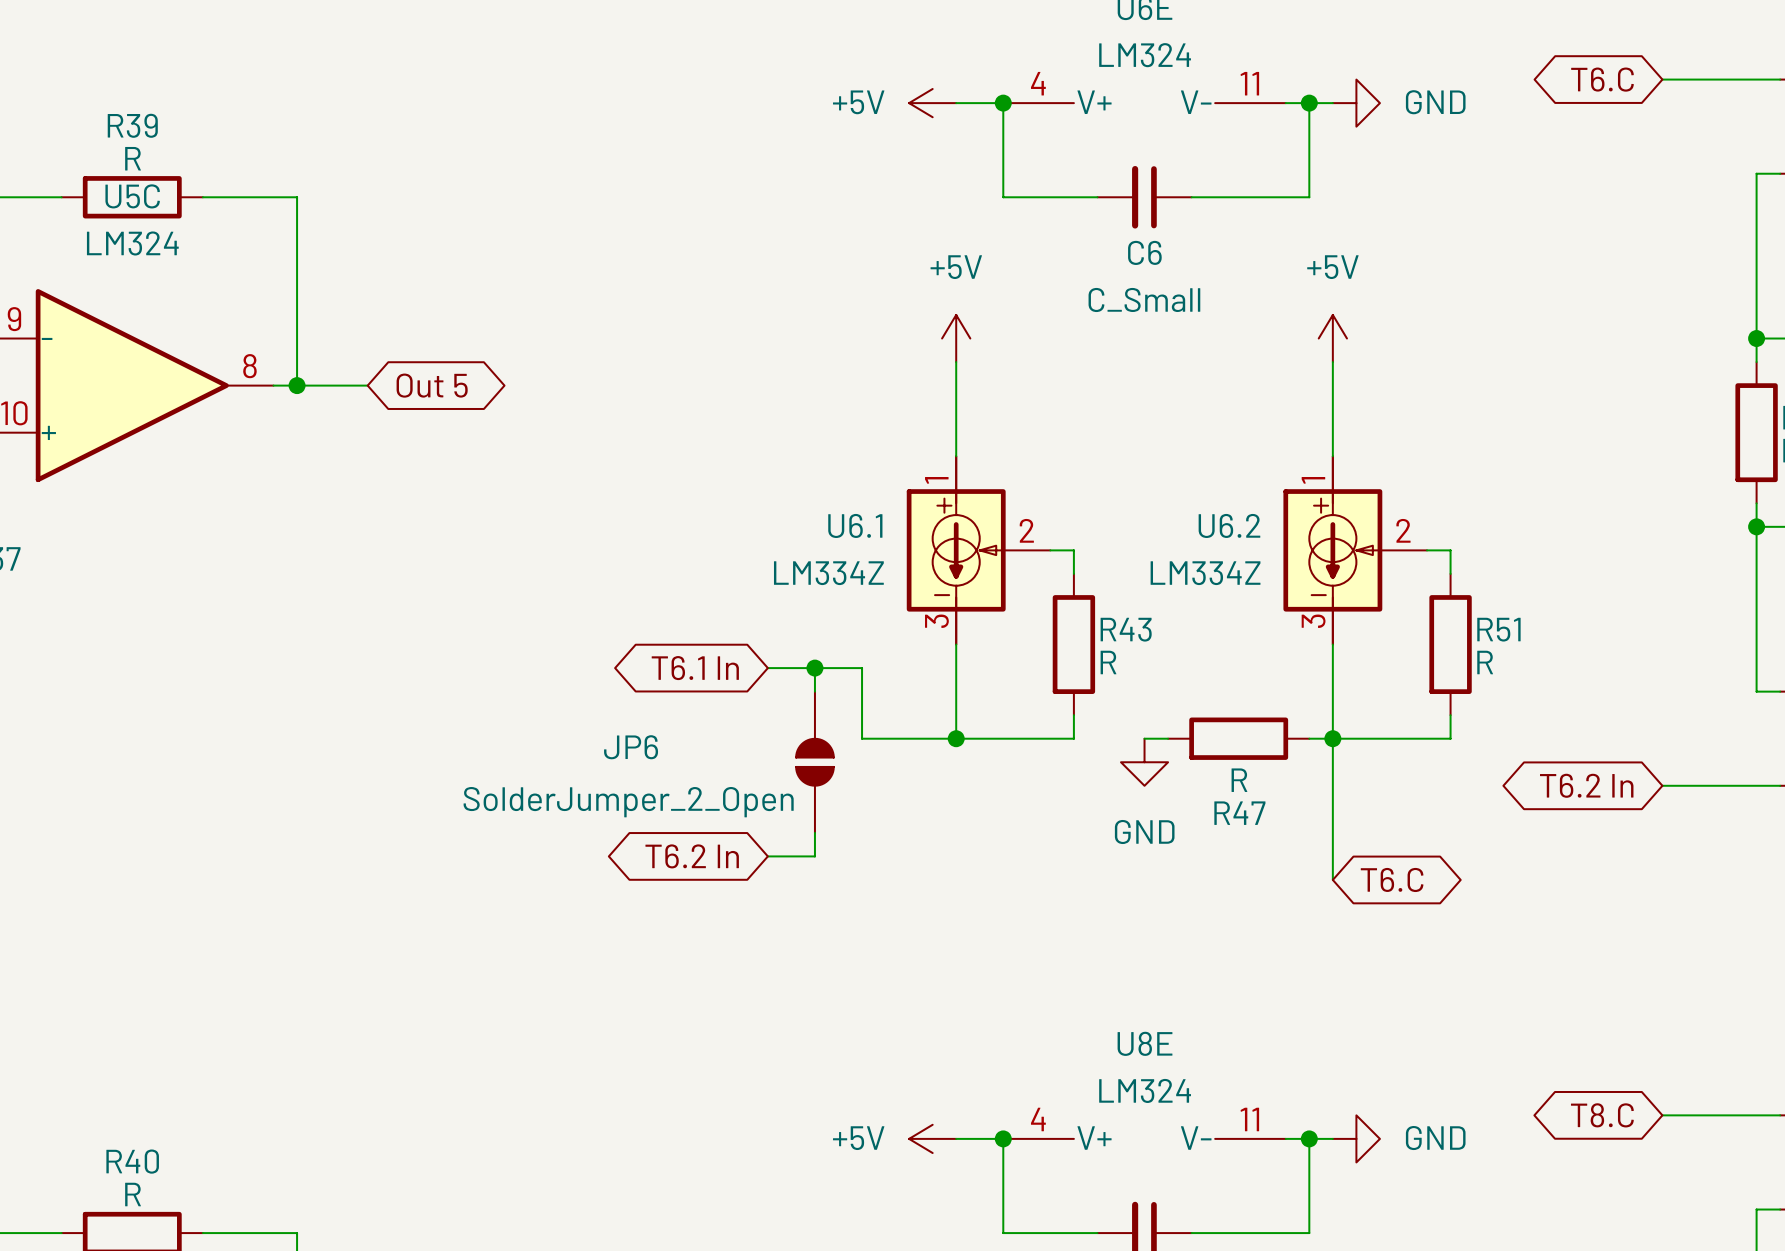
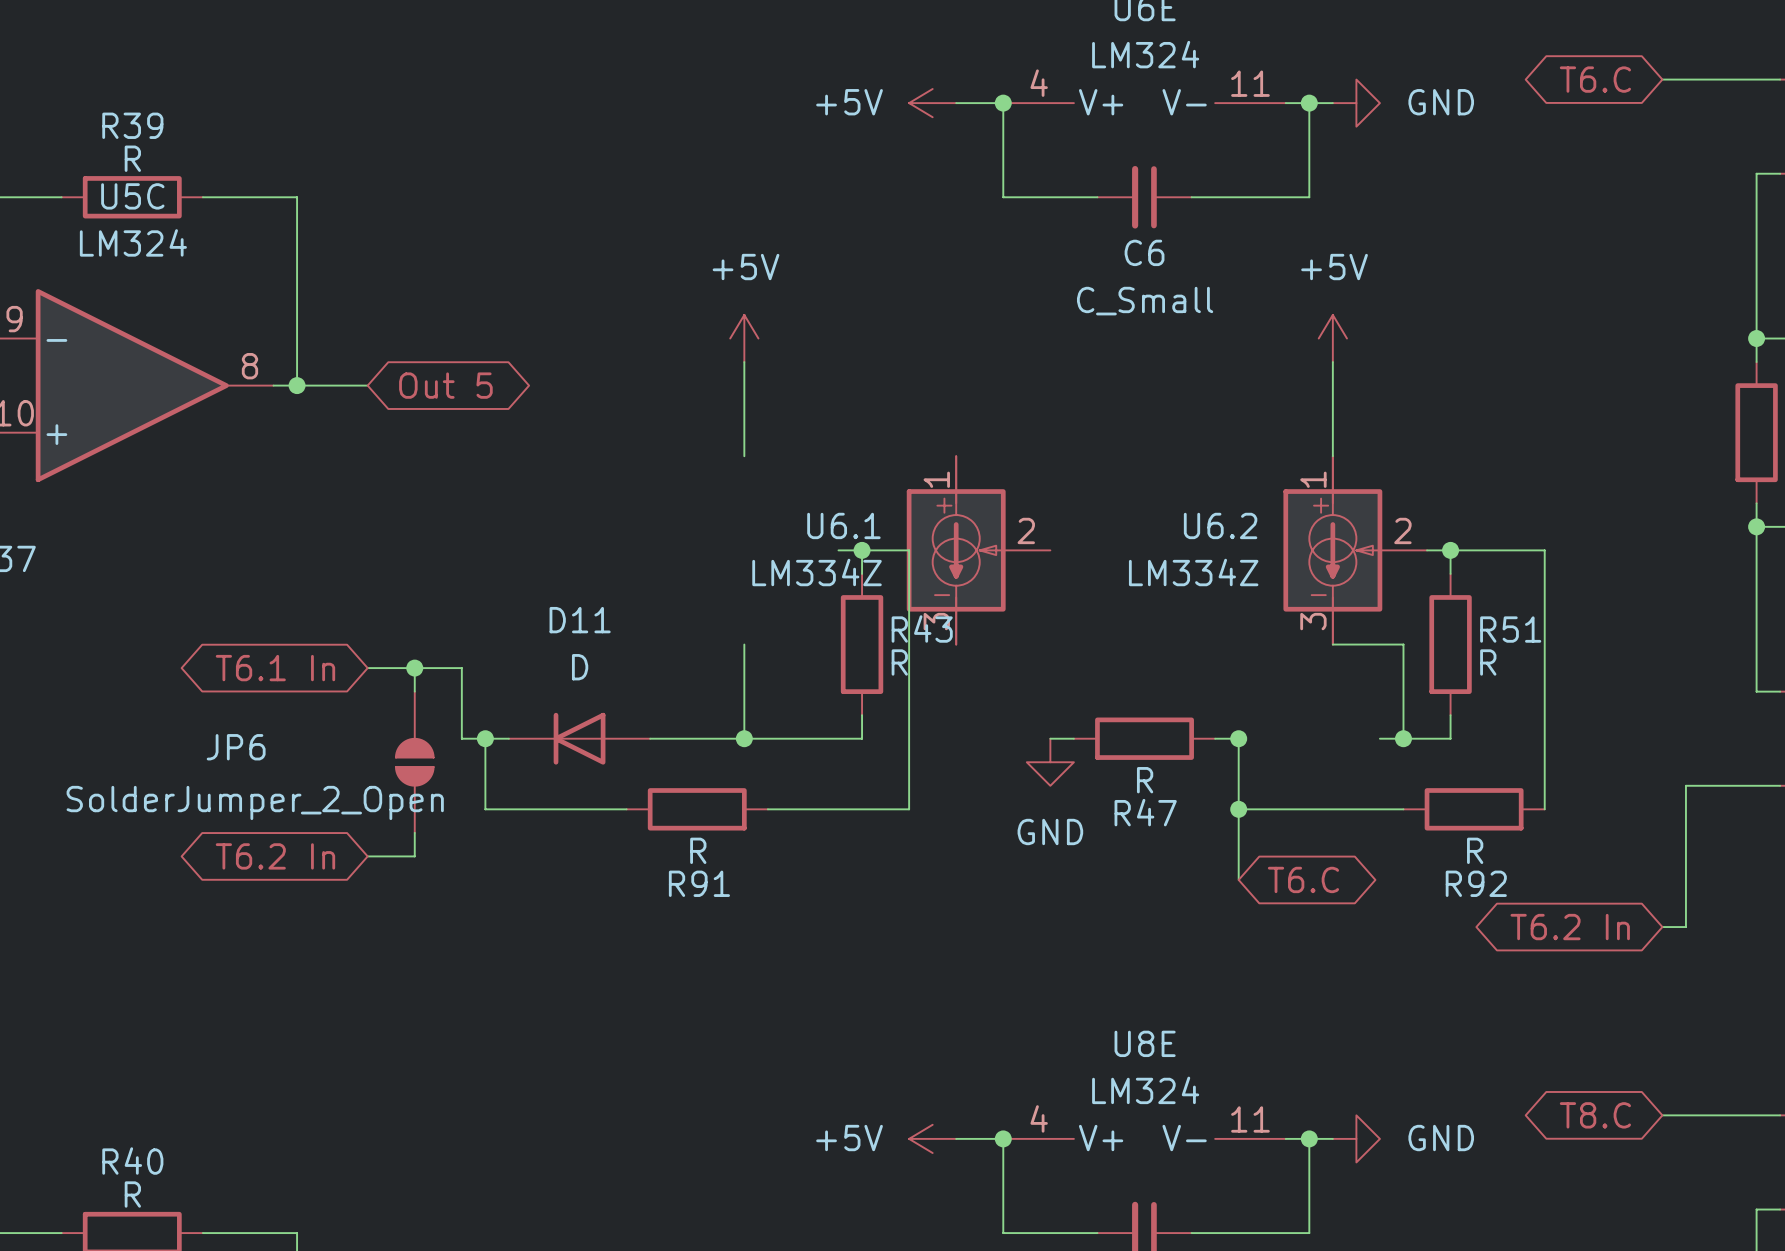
power symbol position: +5V (956, 338) -> +5V (744, 338)
wire: (956, 362) (956, 456) -> (744, 362) (744, 456)
wire: none -> (838, 550) (909, 550) (909, 809) (767, 809)
junction: none -> (862, 550)
wire: (1050, 550) (1073, 550) (1073, 573) -> none
wire: none -> (1450, 550) (1544, 550) (1544, 809)
junction: none -> (1450, 550)
wire: (956, 644) (956, 738) -> (744, 644) (744, 738)
R43 position: (1073, 644) -> (862, 644)
wire: (1332, 644) (1332, 879) -> (1332, 644) (1403, 644) (1403, 738)
wire: none -> (367, 668) (461, 668) (461, 738) (508, 738)
junction: none -> (414, 668)
global label position: T6.1 In (695, 668) -> T6.1 In (275, 668)
wire: (767, 668) (862, 668) (862, 715) -> none
wire: (814, 668) (814, 691) -> (414, 668) (414, 691)
junction: (814, 668) -> none
wire: (1073, 715) (1073, 738) -> (862, 550) (862, 573)
wire: none -> (485, 738) (485, 809) (626, 809)
junction: none -> (485, 738)
D11: none -> D (579, 738)
junction: none -> (744, 738)
wire: (862, 738) (1050, 738) -> (862, 738) (650, 738)
junction: (956, 738) -> none
wire: (1144, 738) (1168, 738) -> none
wire: none -> (1215, 738) (1238, 738) (1238, 879)
junction: none -> (1238, 738)
R47 position: (1238, 738) -> (1144, 738)
wire: (1309, 738) (1379, 738) -> none
junction: (1332, 738) -> none
junction: none -> (1403, 738)
JP6 position: (814, 762) -> (414, 762)
power symbol position: GND (1144, 762) -> GND (1050, 762)
global label position: T6.2 In (1586, 785) -> T6.2 In (1570, 927)
wire: (1662, 785) (1685, 785) -> (1662, 927) (1685, 927) (1685, 785)
R91: none -> R (697, 809)
wire: none -> (1238, 809) (1403, 809)
junction: none -> (1238, 809)
R92: none -> R (1474, 809)
wire: (814, 832) (814, 856) (767, 856) -> (414, 832) (414, 856) (367, 856)
global label position: T6.2 In (692, 856) -> T6.2 In (275, 856)
global label position: T6.C (1392, 879) -> T6.C (1303, 879)

